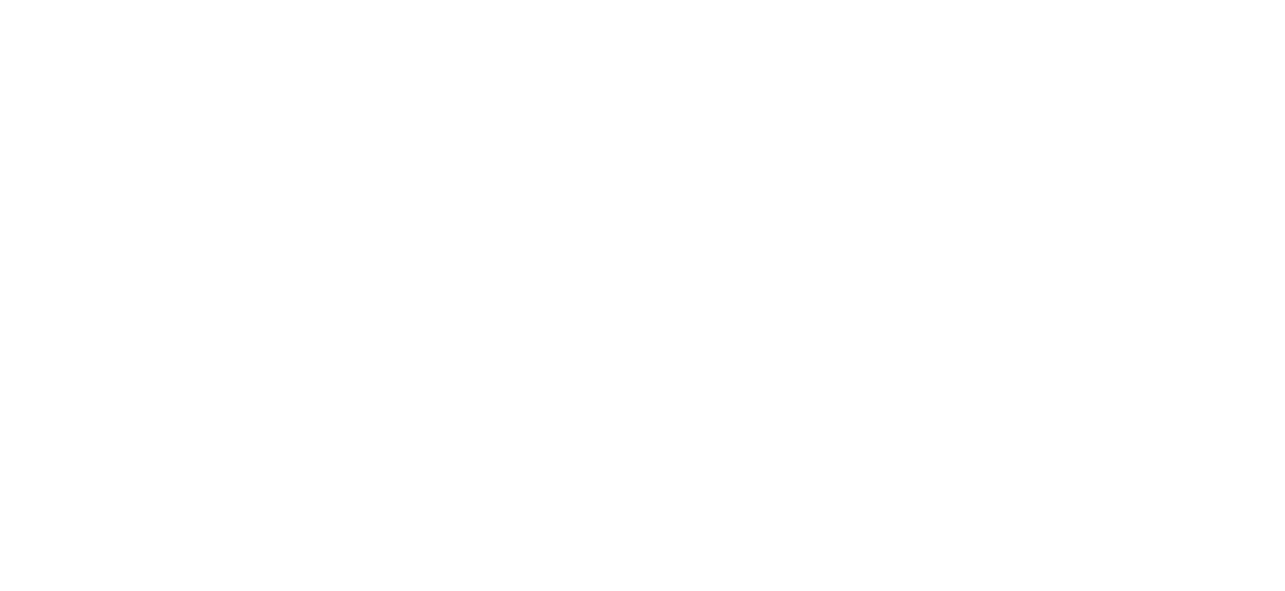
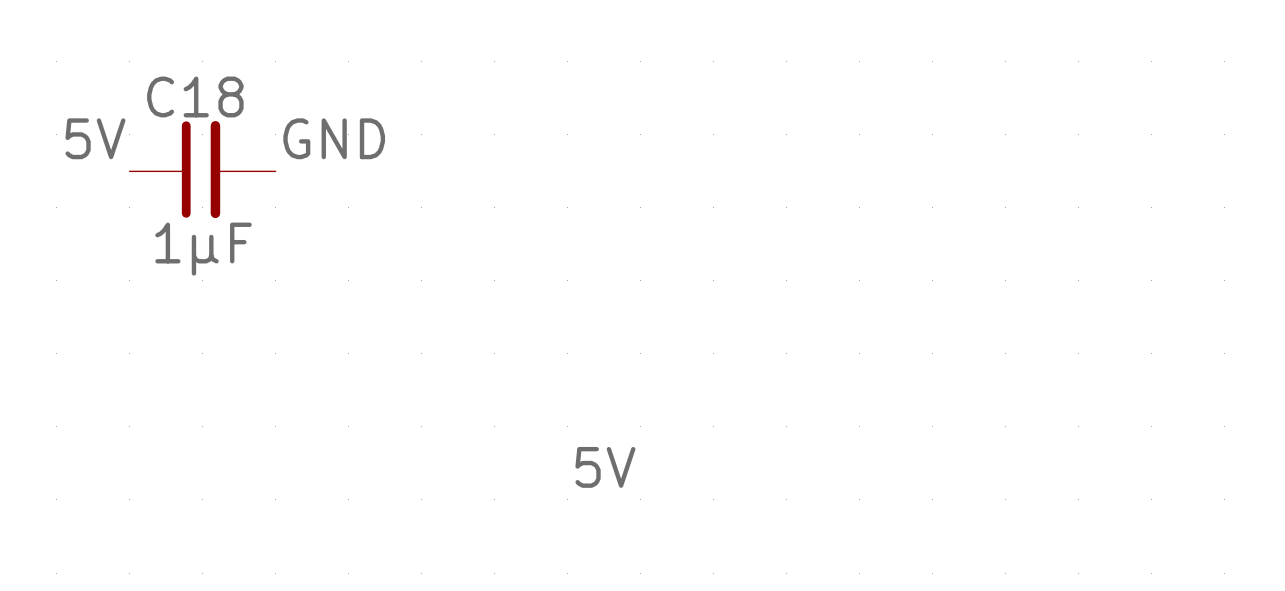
label: none -> GND (334, 138)
label: none -> 5V (95, 138)
C18: none -> 1µF (202, 169)
label: none -> 5V (605, 467)

